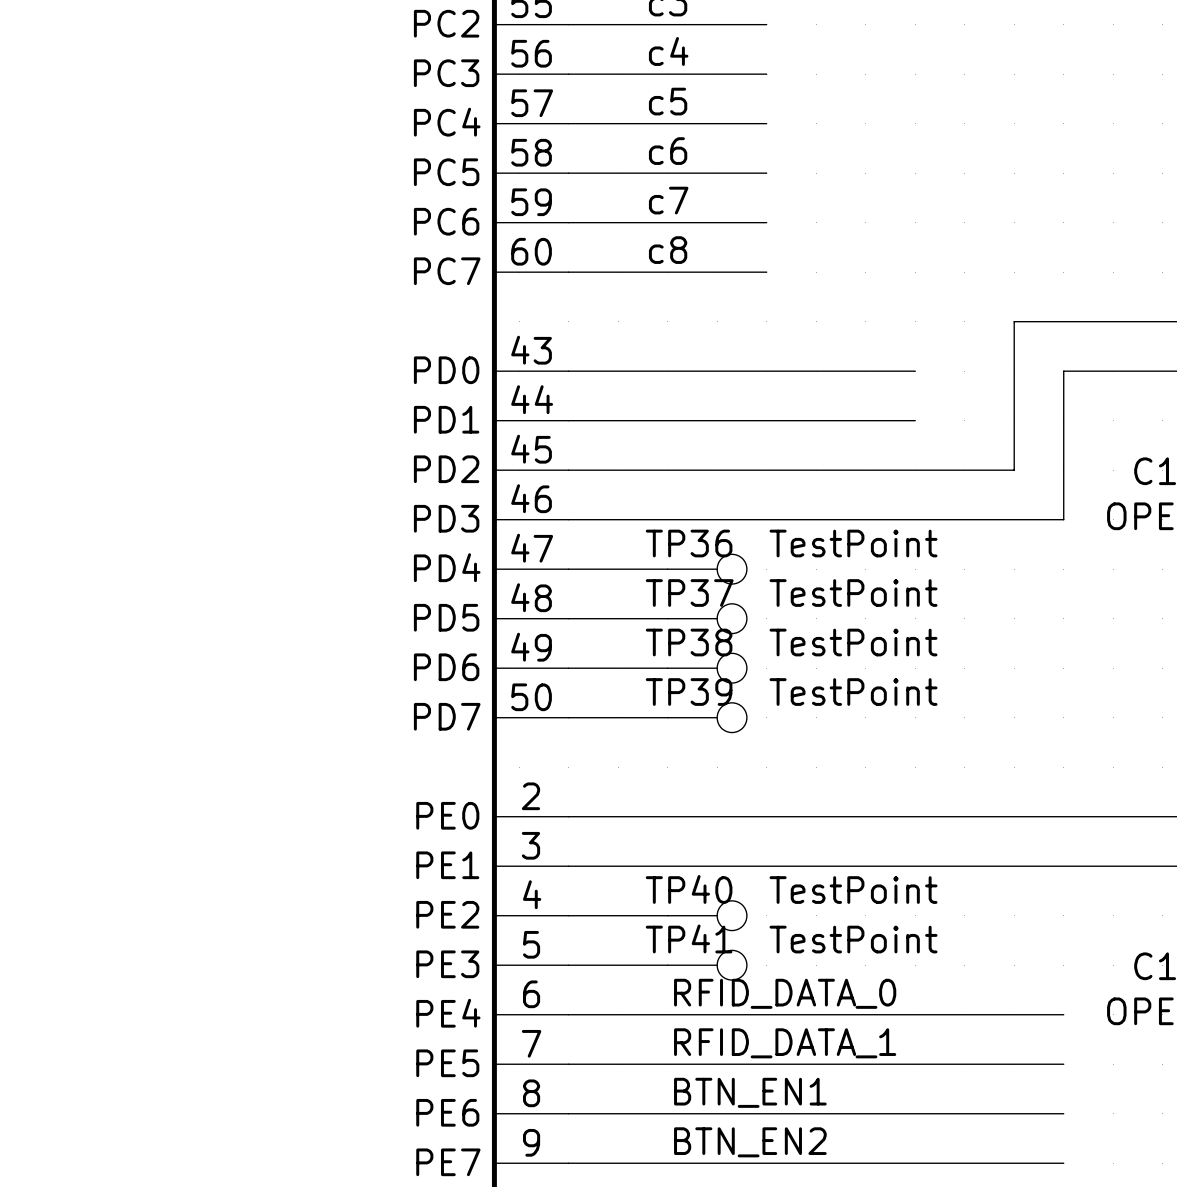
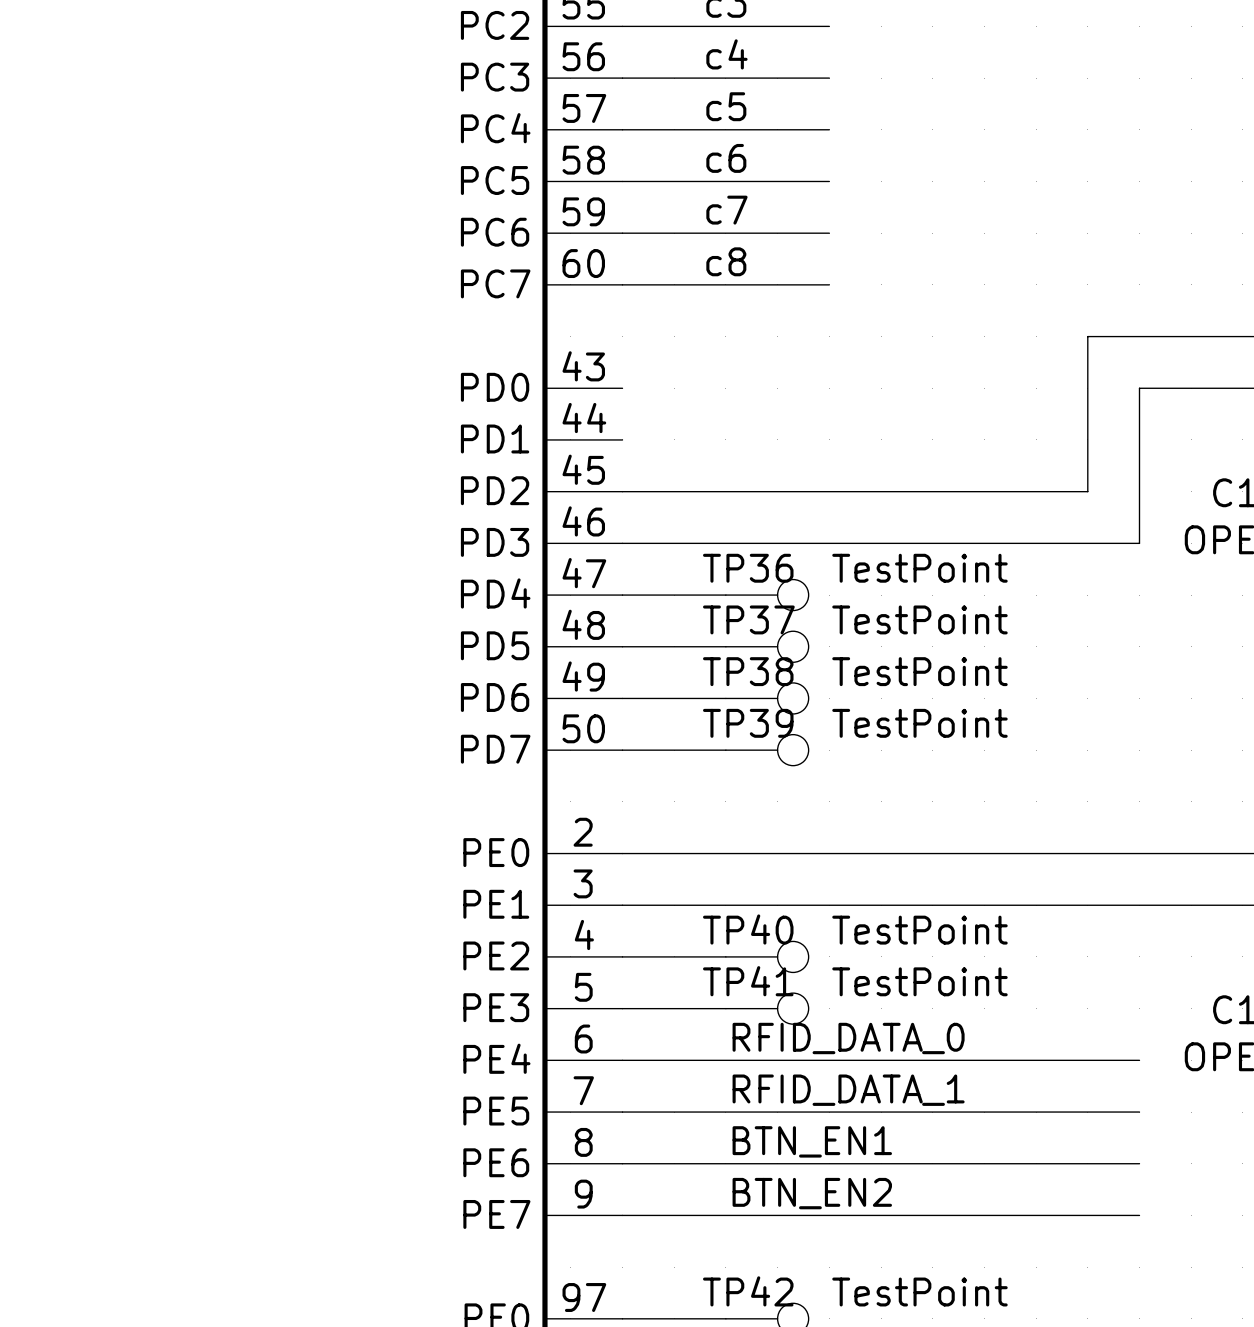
wire: (568, 371) (915, 371) -> none
wire: (568, 420) (915, 420) -> none

